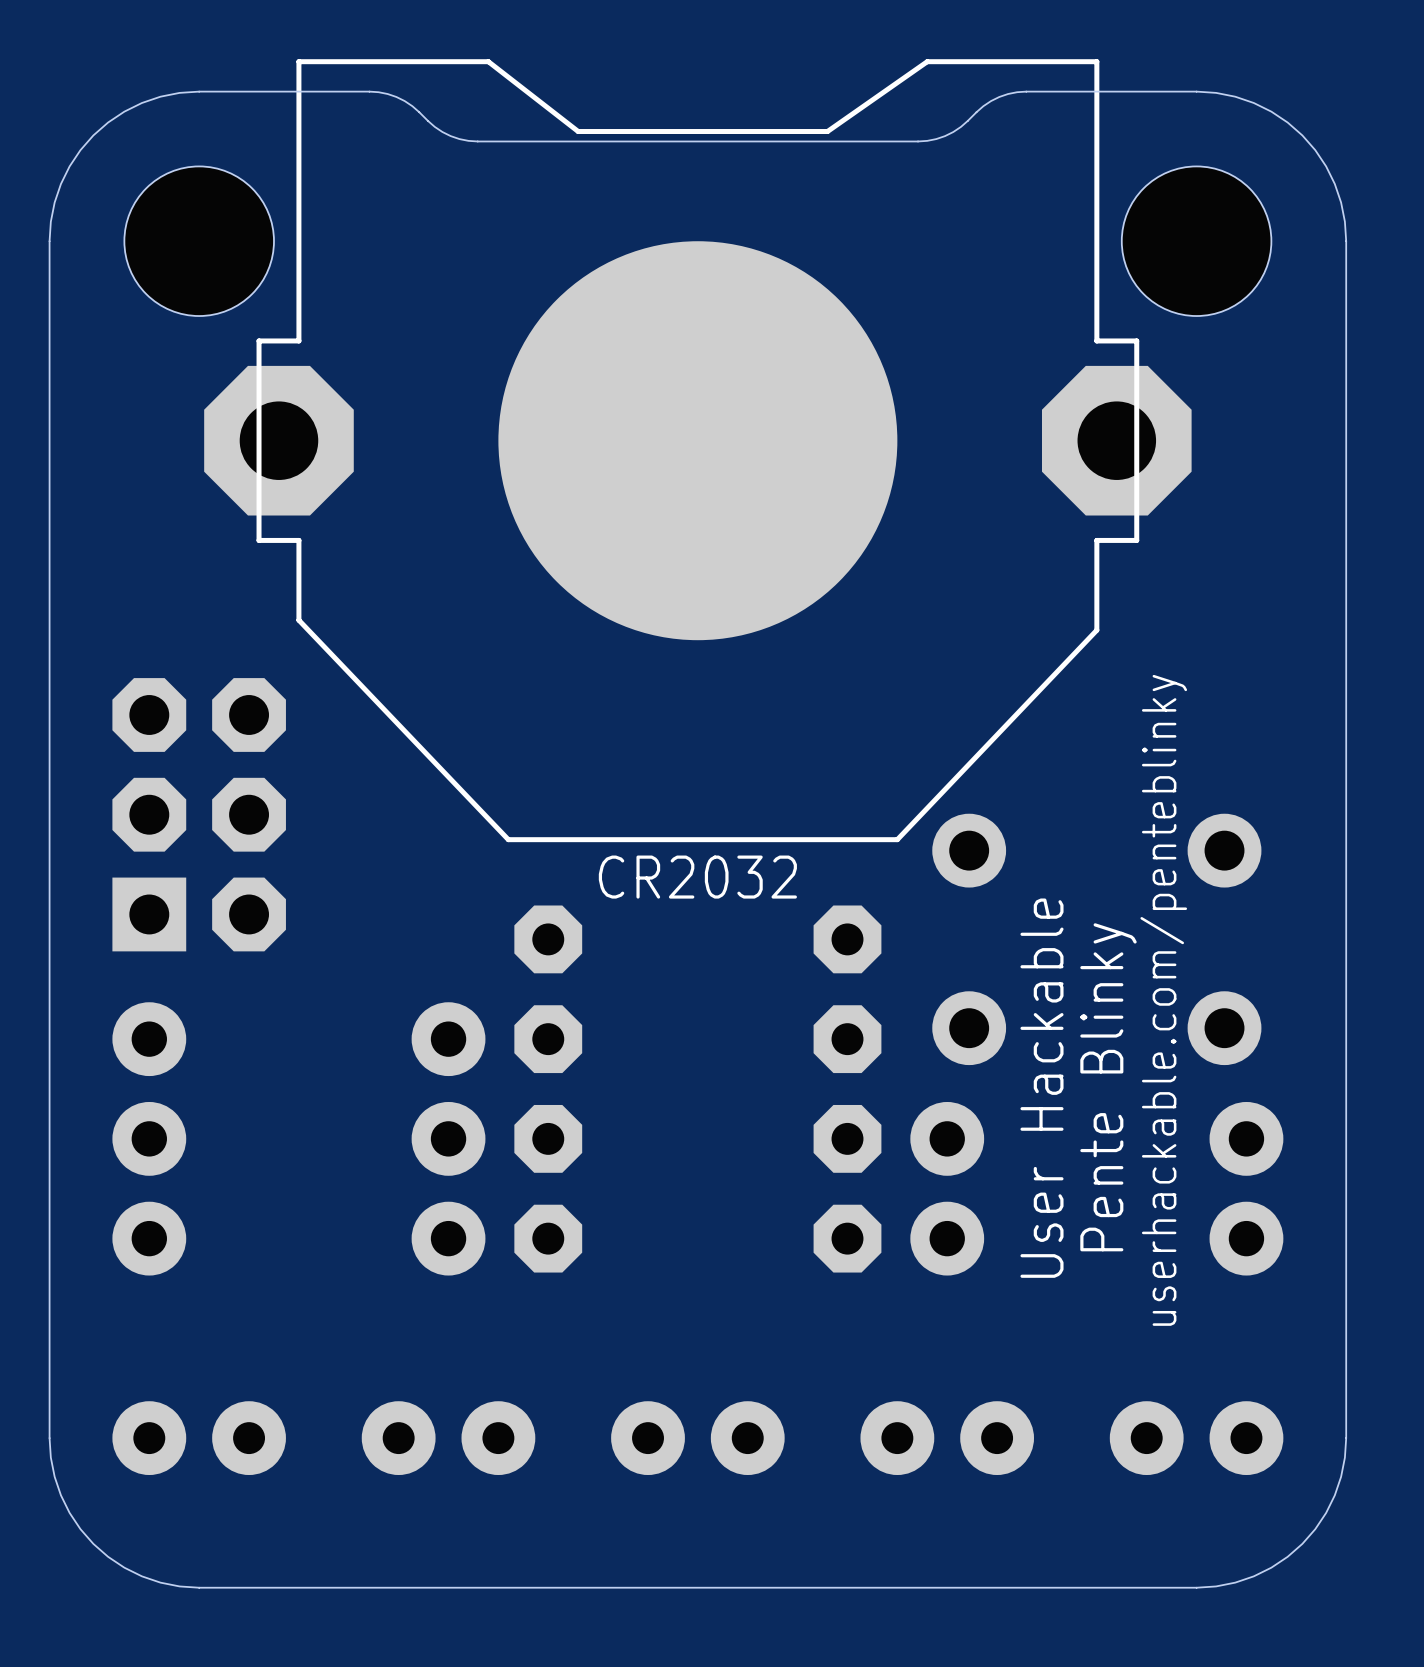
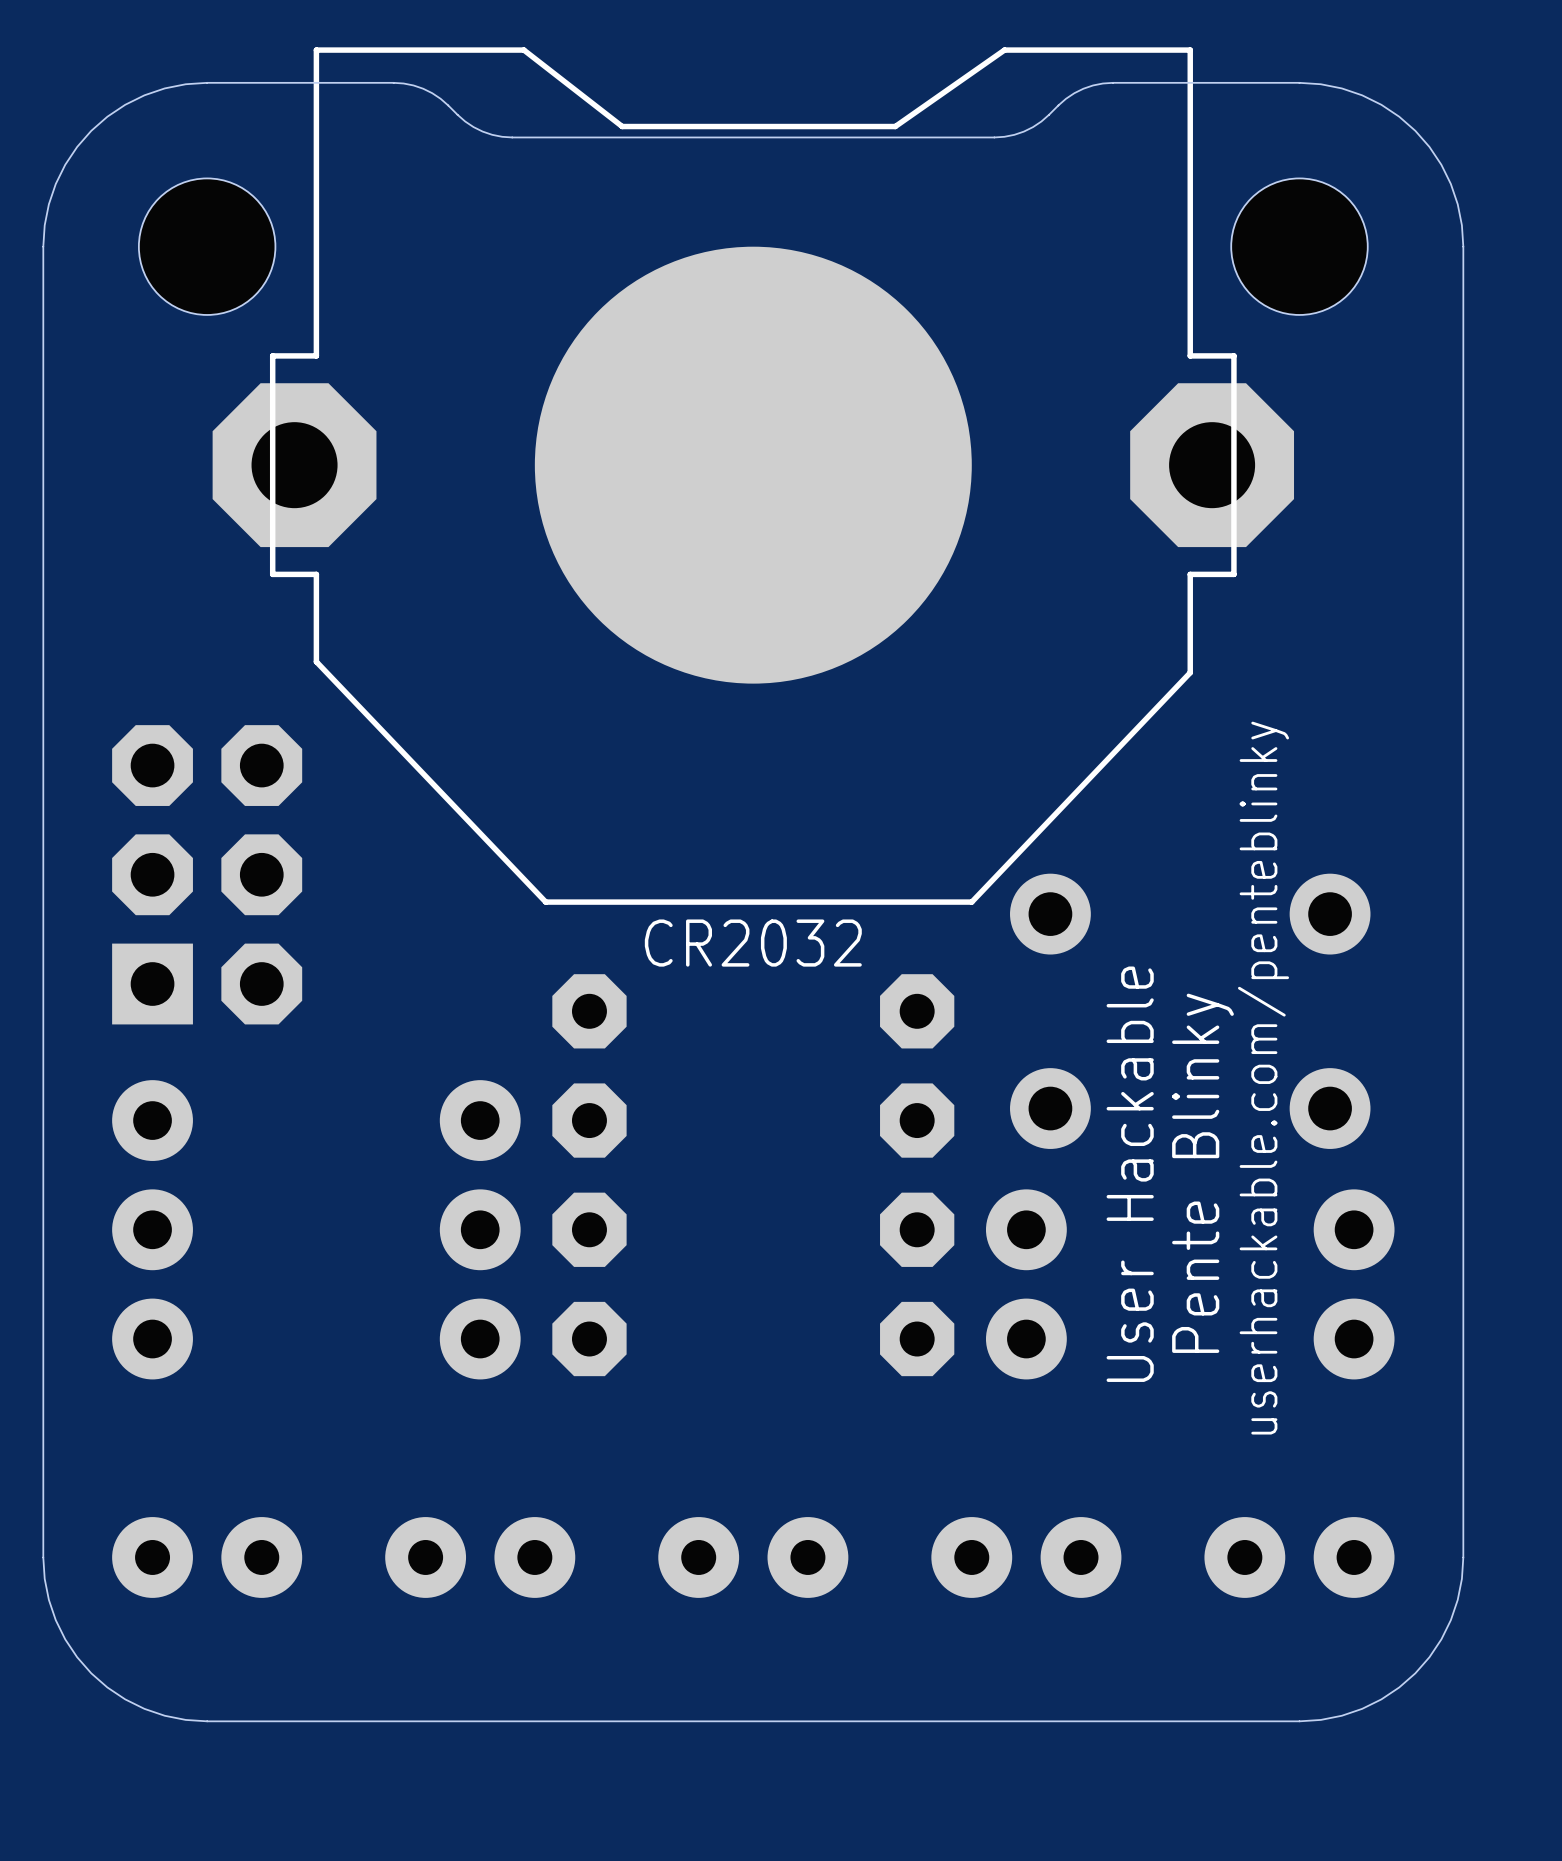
hole size: [124, 166, 274, 317] -> [138, 178, 276, 315]
hole size: [1121, 166, 1272, 317] -> [1231, 178, 1368, 315]

